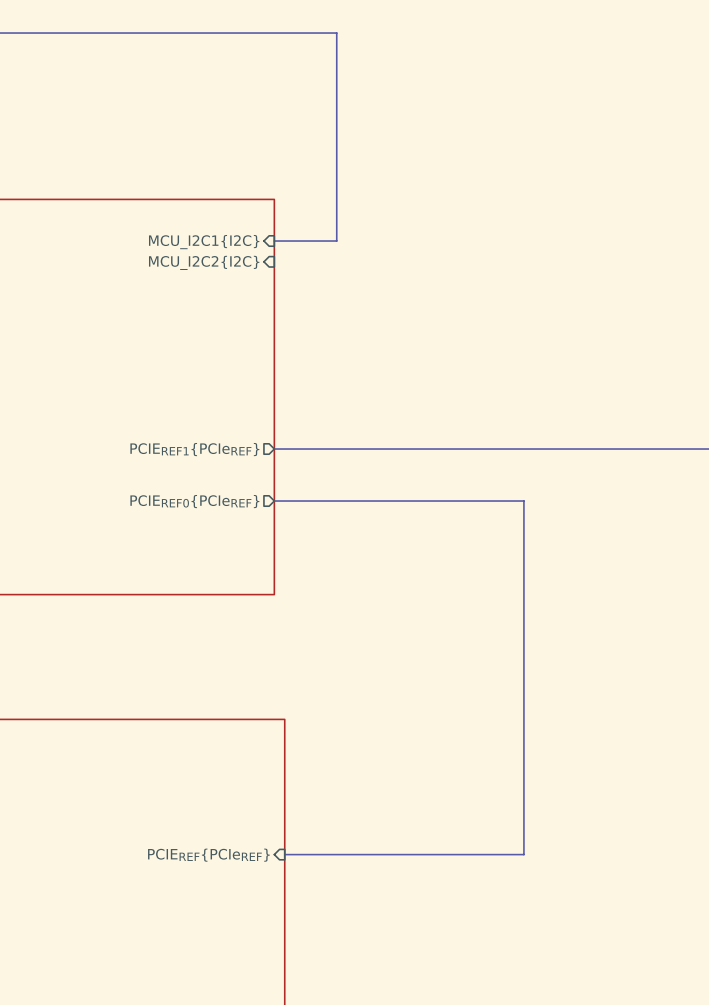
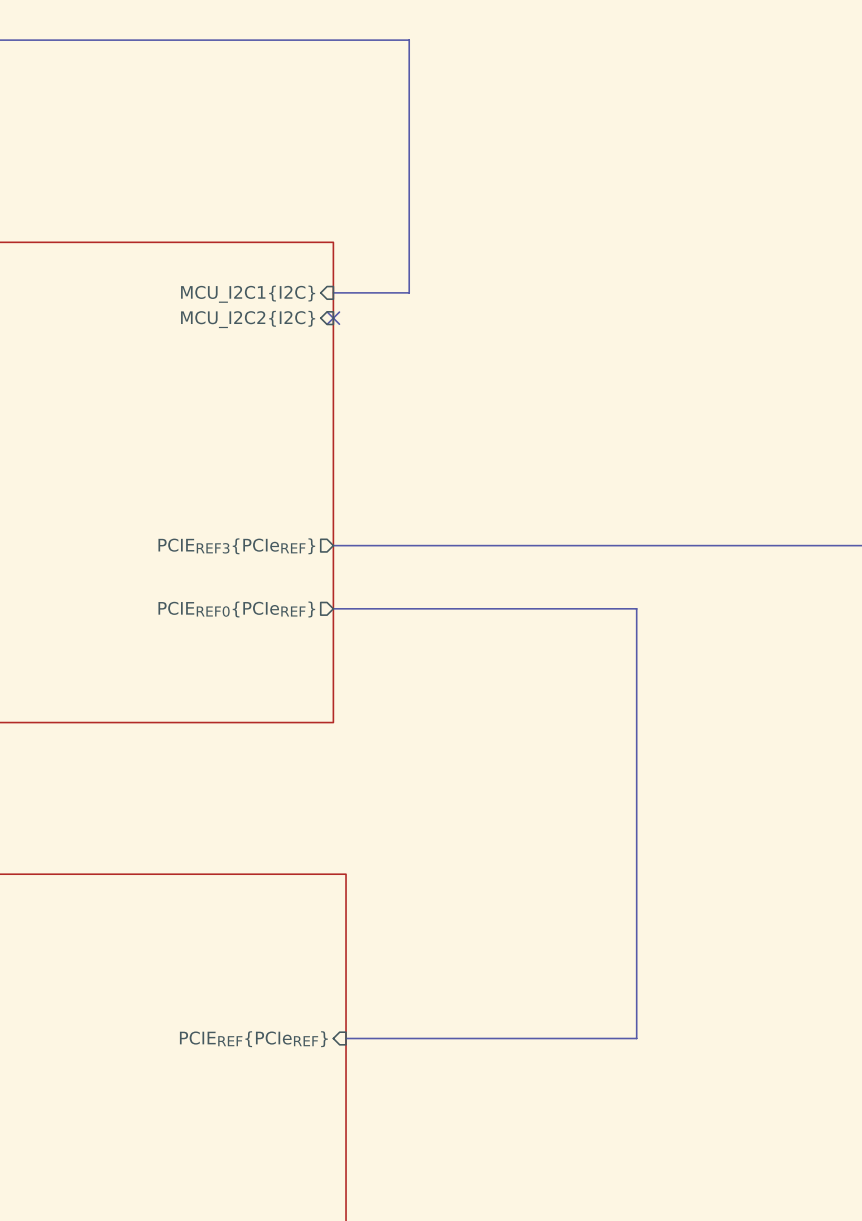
no-connect mark: none -> (333, 318)
sheet pin: PCIEREF1{PCIeREF} (194, 449) -> PCIEREF3{PCIeREF} (236, 546)

